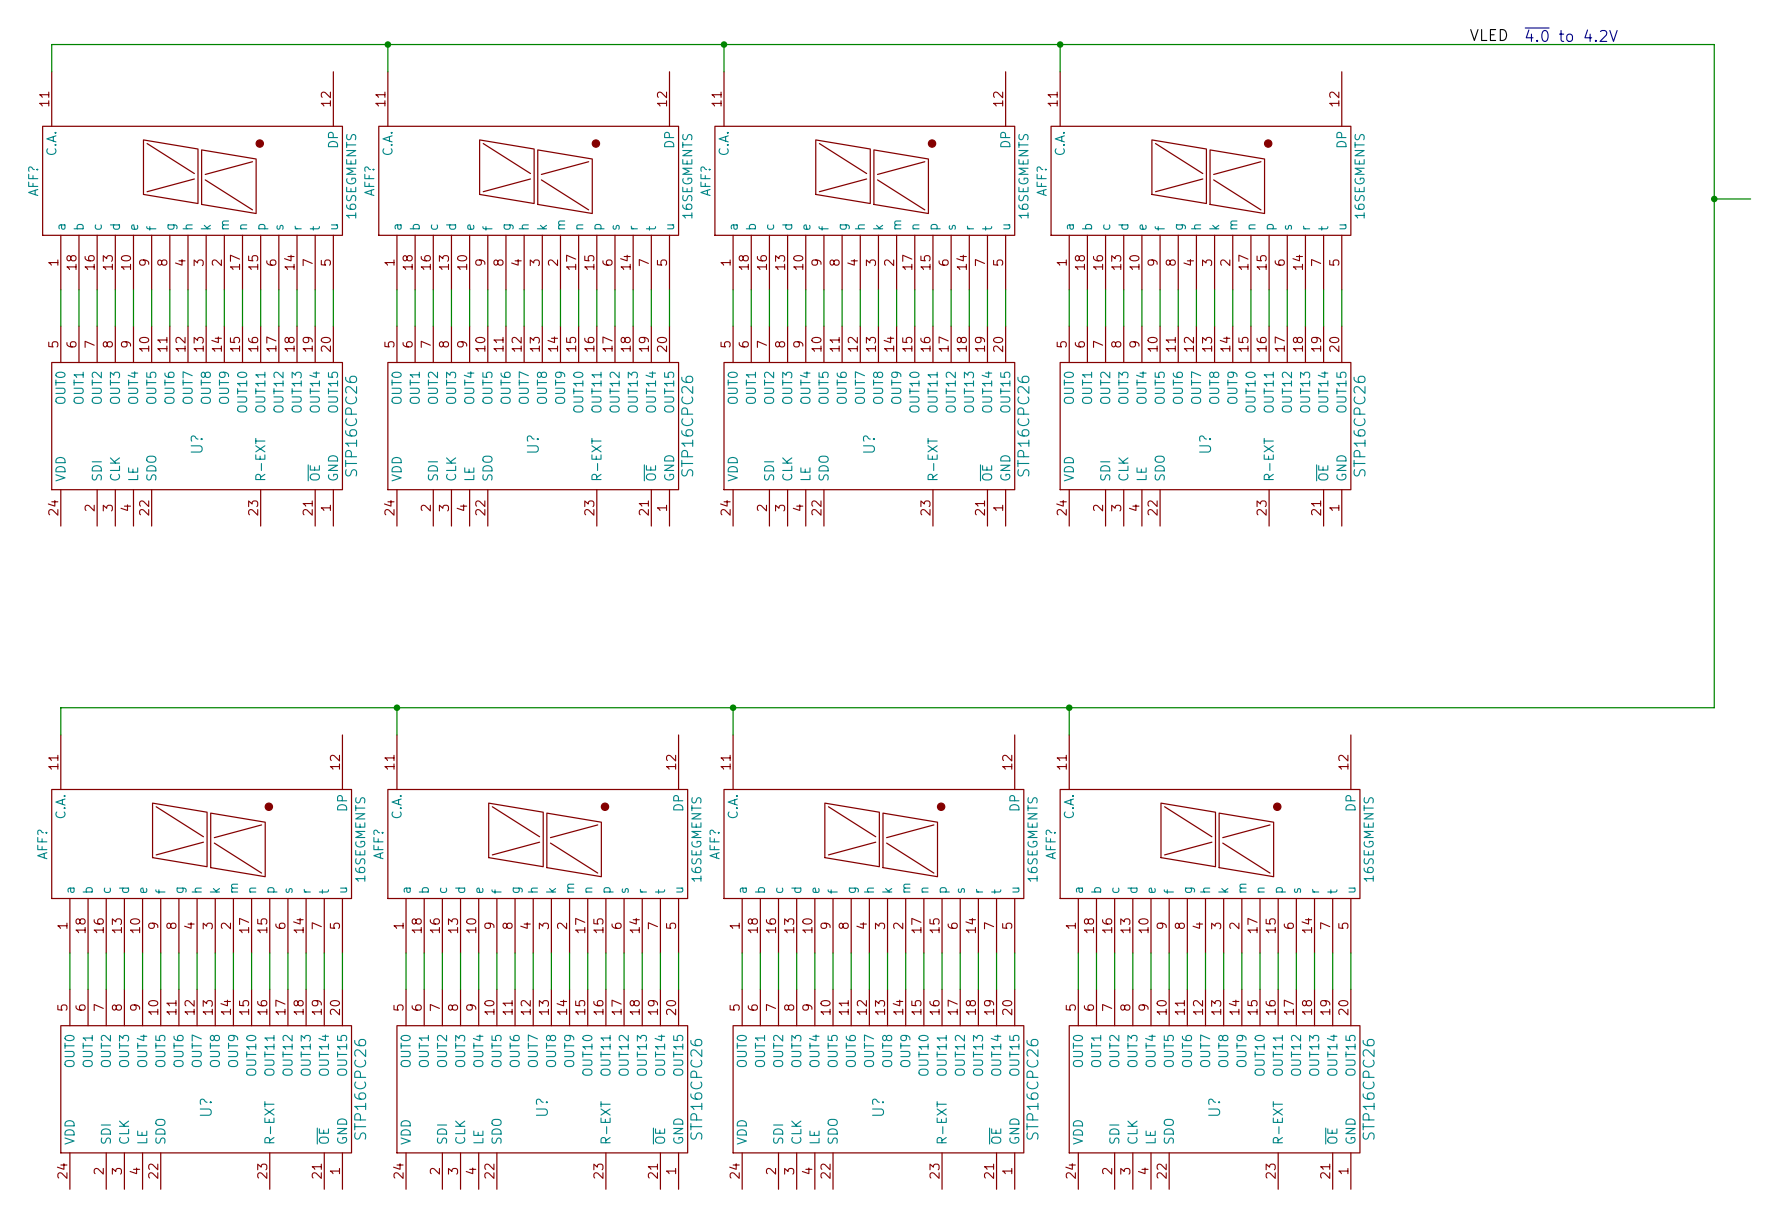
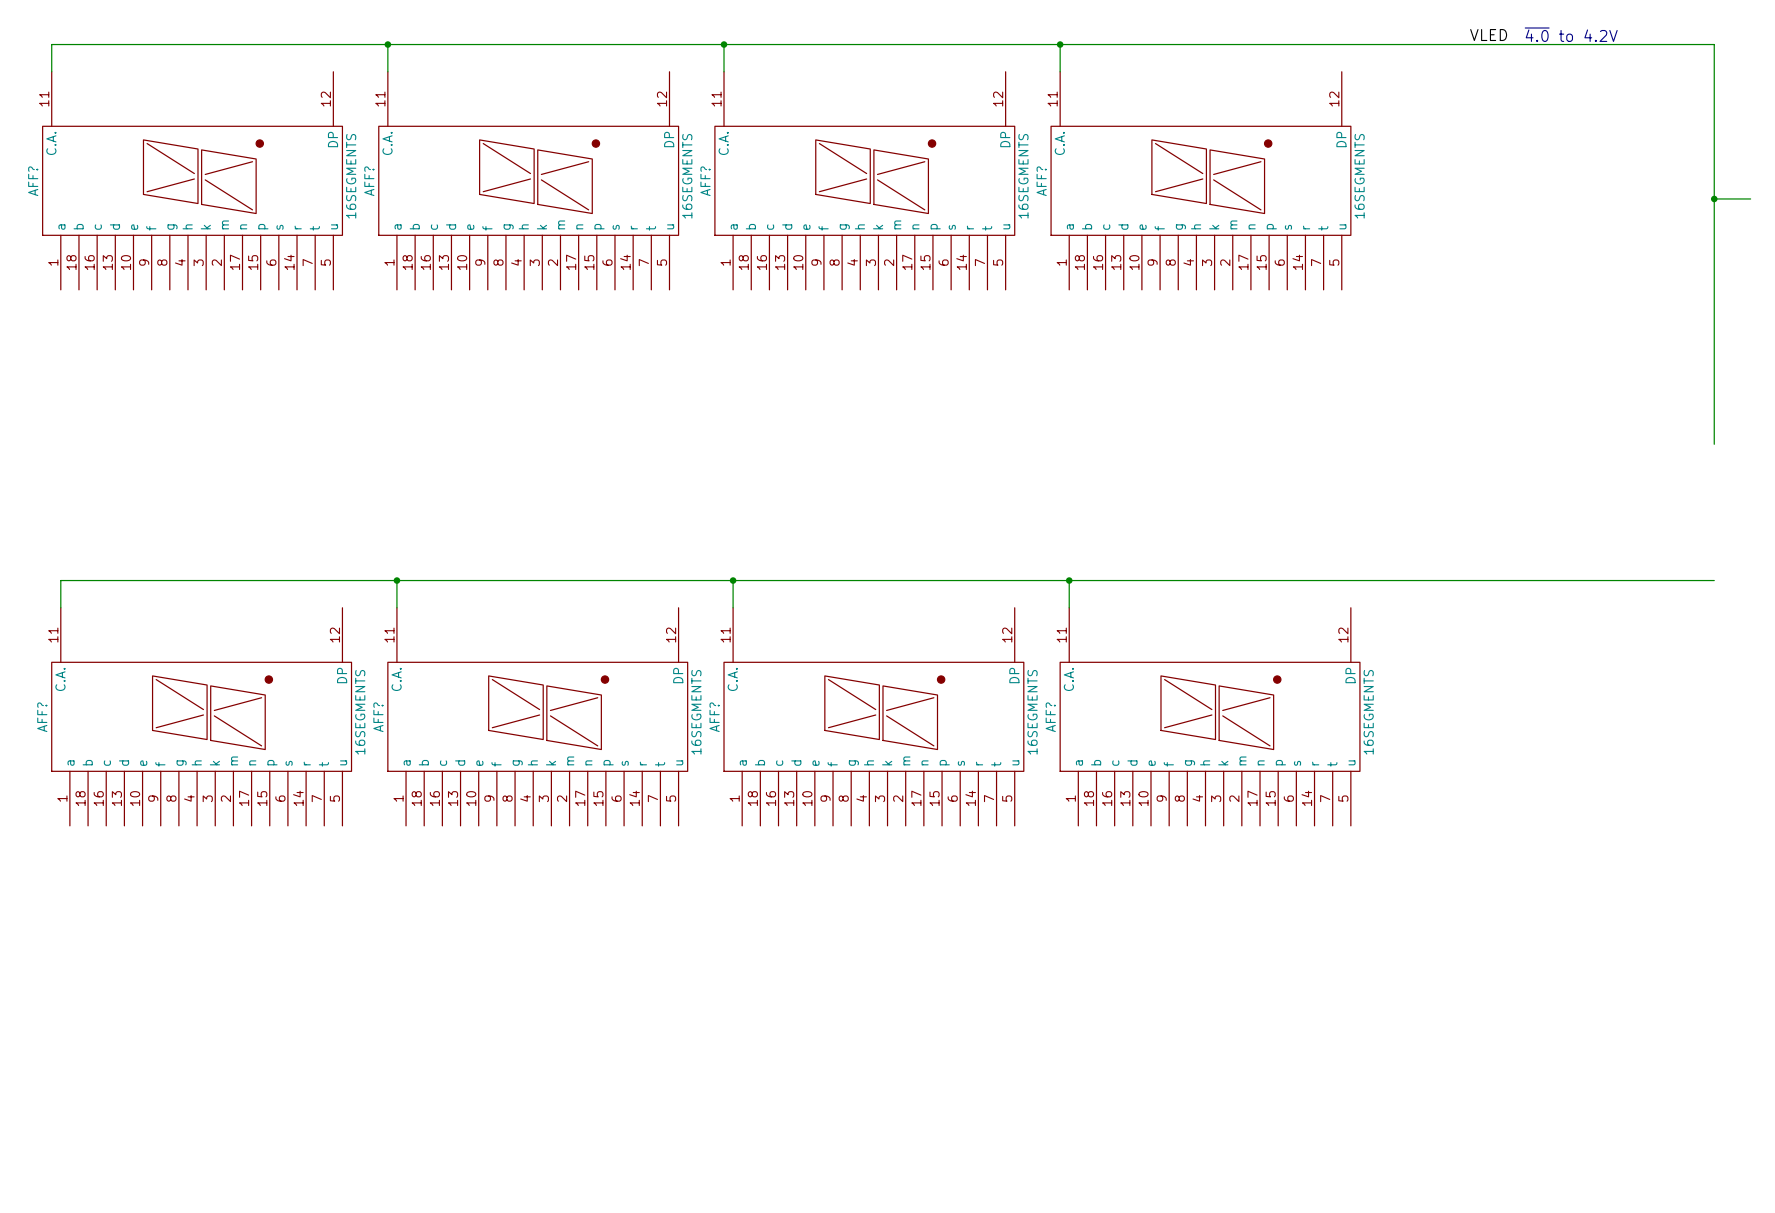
wire: (60, 289) (60, 326) -> none
wire: (78, 289) (78, 326) -> none
wire: (97, 289) (97, 326) -> none
wire: (115, 289) (115, 326) -> none
wire: (133, 289) (133, 326) -> none
wire: (151, 289) (151, 326) -> none
wire: (169, 289) (169, 326) -> none
wire: (187, 289) (187, 326) -> none
wire: (206, 289) (206, 326) -> none
wire: (224, 289) (224, 326) -> none
wire: (242, 289) (242, 326) -> none
wire: (260, 289) (260, 326) -> none
wire: (278, 289) (278, 326) -> none
wire: (297, 289) (297, 326) -> none
wire: (315, 289) (315, 326) -> none
wire: (333, 289) (333, 326) -> none
wire: (396, 289) (396, 326) -> none
wire: (415, 289) (415, 326) -> none
wire: (433, 289) (433, 326) -> none
wire: (451, 289) (451, 326) -> none
wire: (469, 289) (469, 326) -> none
wire: (487, 289) (487, 326) -> none
wire: (505, 289) (505, 326) -> none
wire: (524, 289) (524, 326) -> none
wire: (542, 289) (542, 326) -> none
wire: (560, 289) (560, 326) -> none
wire: (578, 289) (578, 326) -> none
wire: (596, 289) (596, 326) -> none
wire: (614, 289) (614, 326) -> none
wire: (633, 289) (633, 326) -> none
wire: (651, 289) (651, 326) -> none
wire: (669, 289) (669, 326) -> none
wire: (733, 289) (733, 326) -> none
wire: (751, 289) (751, 326) -> none
wire: (769, 289) (769, 326) -> none
wire: (787, 289) (787, 326) -> none
wire: (805, 289) (805, 326) -> none
wire: (823, 289) (823, 326) -> none
wire: (842, 289) (842, 326) -> none
wire: (860, 289) (860, 326) -> none
wire: (878, 289) (878, 326) -> none
wire: (896, 289) (896, 326) -> none
wire: (914, 289) (914, 326) -> none
wire: (932, 289) (932, 326) -> none
wire: (951, 289) (951, 326) -> none
wire: (969, 289) (969, 326) -> none
wire: (987, 289) (987, 326) -> none
wire: (1005, 289) (1005, 326) -> none
wire: (1069, 289) (1069, 326) -> none
wire: (1087, 289) (1087, 326) -> none
wire: (1105, 289) (1105, 326) -> none
wire: (1123, 289) (1123, 326) -> none
wire: (1141, 289) (1141, 326) -> none
wire: (1160, 289) (1160, 326) -> none
wire: (1178, 289) (1178, 326) -> none
wire: (1196, 289) (1196, 326) -> none
wire: (1214, 289) (1214, 326) -> none
wire: (1232, 289) (1232, 326) -> none
wire: (1250, 289) (1250, 326) -> none
wire: (1269, 289) (1269, 326) -> none
wire: (1287, 289) (1287, 326) -> none
wire: (1305, 289) (1305, 326) -> none
wire: (1323, 289) (1323, 326) -> none
wire: (1341, 289) (1341, 326) -> none
U?: STP16CPC26 (197, 426) -> none
U?: STP16CPC26 (533, 426) -> none
U?: STP16CPC26 (869, 426) -> none
U?: STP16CPC26 (1205, 426) -> none
wire: (1714, 444) (1714, 707) (60, 707) (60, 734) -> none
junction: none -> (396, 580)
junction: none -> (733, 580)
junction: none -> (1069, 580)
wire: none -> (1714, 580) (60, 580) (60, 607)
wire: (396, 707) (396, 734) -> (396, 580) (396, 607)
junction: (396, 707) -> none
wire: (733, 707) (733, 734) -> (733, 580) (733, 607)
junction: (733, 707) -> none
wire: (1069, 707) (1069, 734) -> (1069, 580) (1069, 607)
junction: (1069, 707) -> none
AFF? position: (201, 844) -> (201, 716)
AFF? position: (537, 844) -> (537, 716)
AFF? position: (873, 844) -> (873, 716)
AFF? position: (1210, 844) -> (1210, 716)
wire: (69, 953) (69, 989) -> none
wire: (88, 953) (88, 989) -> none
wire: (106, 953) (106, 989) -> none
wire: (124, 953) (124, 989) -> none
wire: (142, 953) (142, 989) -> none
wire: (160, 953) (160, 989) -> none
wire: (178, 953) (178, 989) -> none
wire: (197, 953) (197, 989) -> none
wire: (215, 953) (215, 989) -> none
wire: (233, 953) (233, 989) -> none
wire: (251, 953) (251, 989) -> none
wire: (269, 953) (269, 989) -> none
wire: (287, 953) (287, 989) -> none
wire: (306, 953) (306, 989) -> none
wire: (324, 953) (324, 989) -> none
wire: (342, 953) (342, 989) -> none
wire: (406, 953) (406, 989) -> none
wire: (424, 953) (424, 989) -> none
wire: (442, 953) (442, 989) -> none
wire: (460, 953) (460, 989) -> none
wire: (478, 953) (478, 989) -> none
wire: (496, 953) (496, 989) -> none
wire: (515, 953) (515, 989) -> none
wire: (533, 953) (533, 989) -> none
wire: (551, 953) (551, 989) -> none
wire: (569, 953) (569, 989) -> none
wire: (587, 953) (587, 989) -> none
wire: (605, 953) (605, 989) -> none
wire: (624, 953) (624, 989) -> none
wire: (642, 953) (642, 989) -> none
wire: (660, 953) (660, 989) -> none
wire: (678, 953) (678, 989) -> none
wire: (742, 953) (742, 989) -> none
wire: (760, 953) (760, 989) -> none
wire: (778, 953) (778, 989) -> none
wire: (796, 953) (796, 989) -> none
wire: (814, 953) (814, 989) -> none
wire: (833, 953) (833, 989) -> none
wire: (851, 953) (851, 989) -> none
wire: (869, 953) (869, 989) -> none
wire: (887, 953) (887, 989) -> none
wire: (905, 953) (905, 989) -> none
wire: (923, 953) (923, 989) -> none
wire: (942, 953) (942, 989) -> none
wire: (960, 953) (960, 989) -> none
wire: (978, 953) (978, 989) -> none
wire: (996, 953) (996, 989) -> none
wire: (1014, 953) (1014, 989) -> none
wire: (1078, 953) (1078, 989) -> none
wire: (1096, 953) (1096, 989) -> none
wire: (1114, 953) (1114, 989) -> none
wire: (1132, 953) (1132, 989) -> none
wire: (1150, 953) (1150, 989) -> none
wire: (1169, 953) (1169, 989) -> none
wire: (1187, 953) (1187, 989) -> none
wire: (1205, 953) (1205, 989) -> none
wire: (1223, 953) (1223, 989) -> none
wire: (1241, 953) (1241, 989) -> none
wire: (1260, 953) (1260, 989) -> none
wire: (1278, 953) (1278, 989) -> none
wire: (1296, 953) (1296, 989) -> none
wire: (1314, 953) (1314, 989) -> none
wire: (1332, 953) (1332, 989) -> none
wire: (1350, 953) (1350, 989) -> none
U?: STP16CPC26 (206, 1089) -> none
U?: STP16CPC26 (542, 1089) -> none
U?: STP16CPC26 (878, 1089) -> none
U?: STP16CPC26 (1214, 1089) -> none

